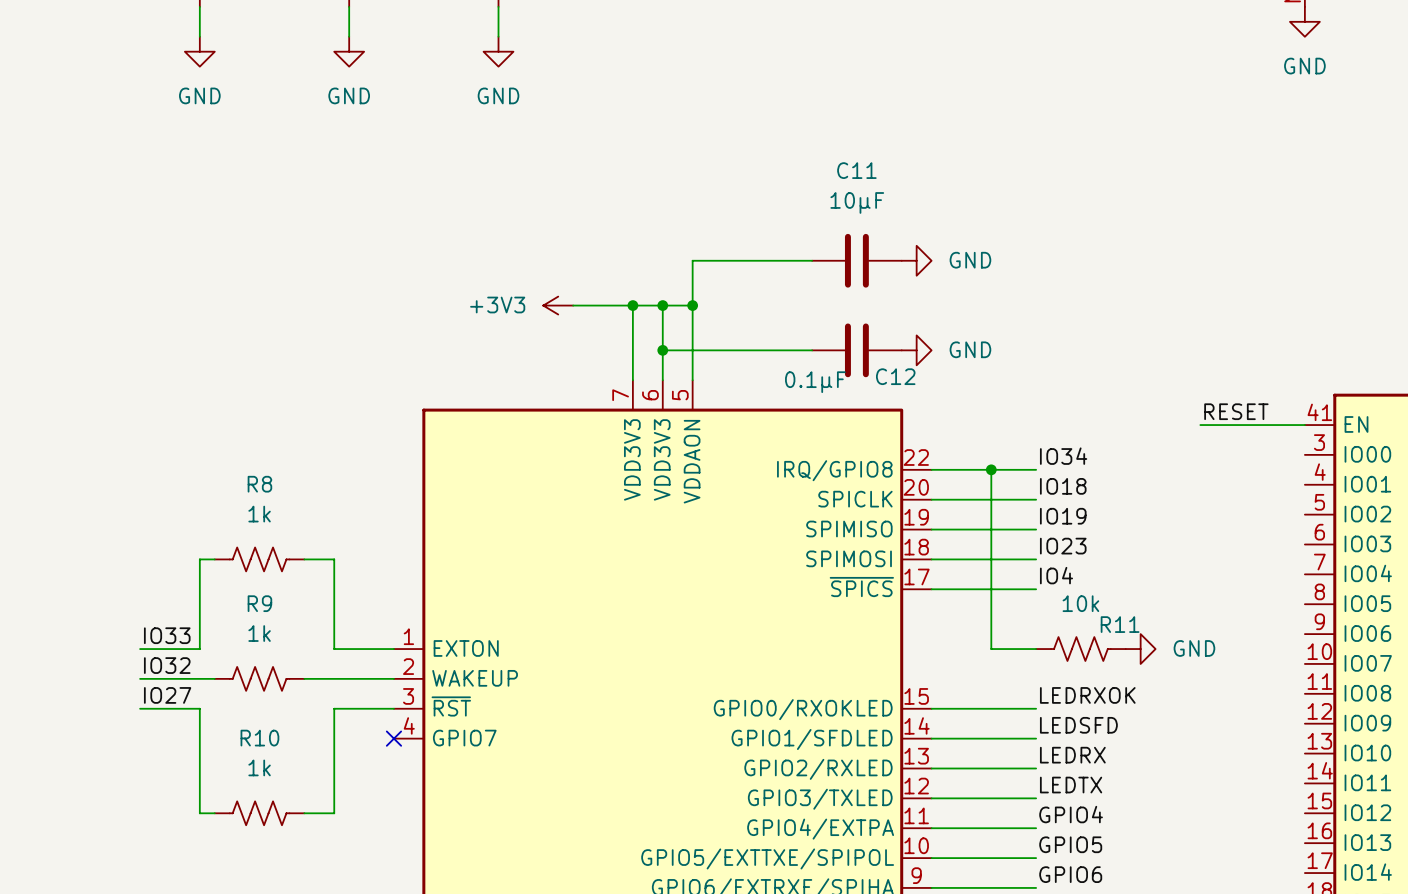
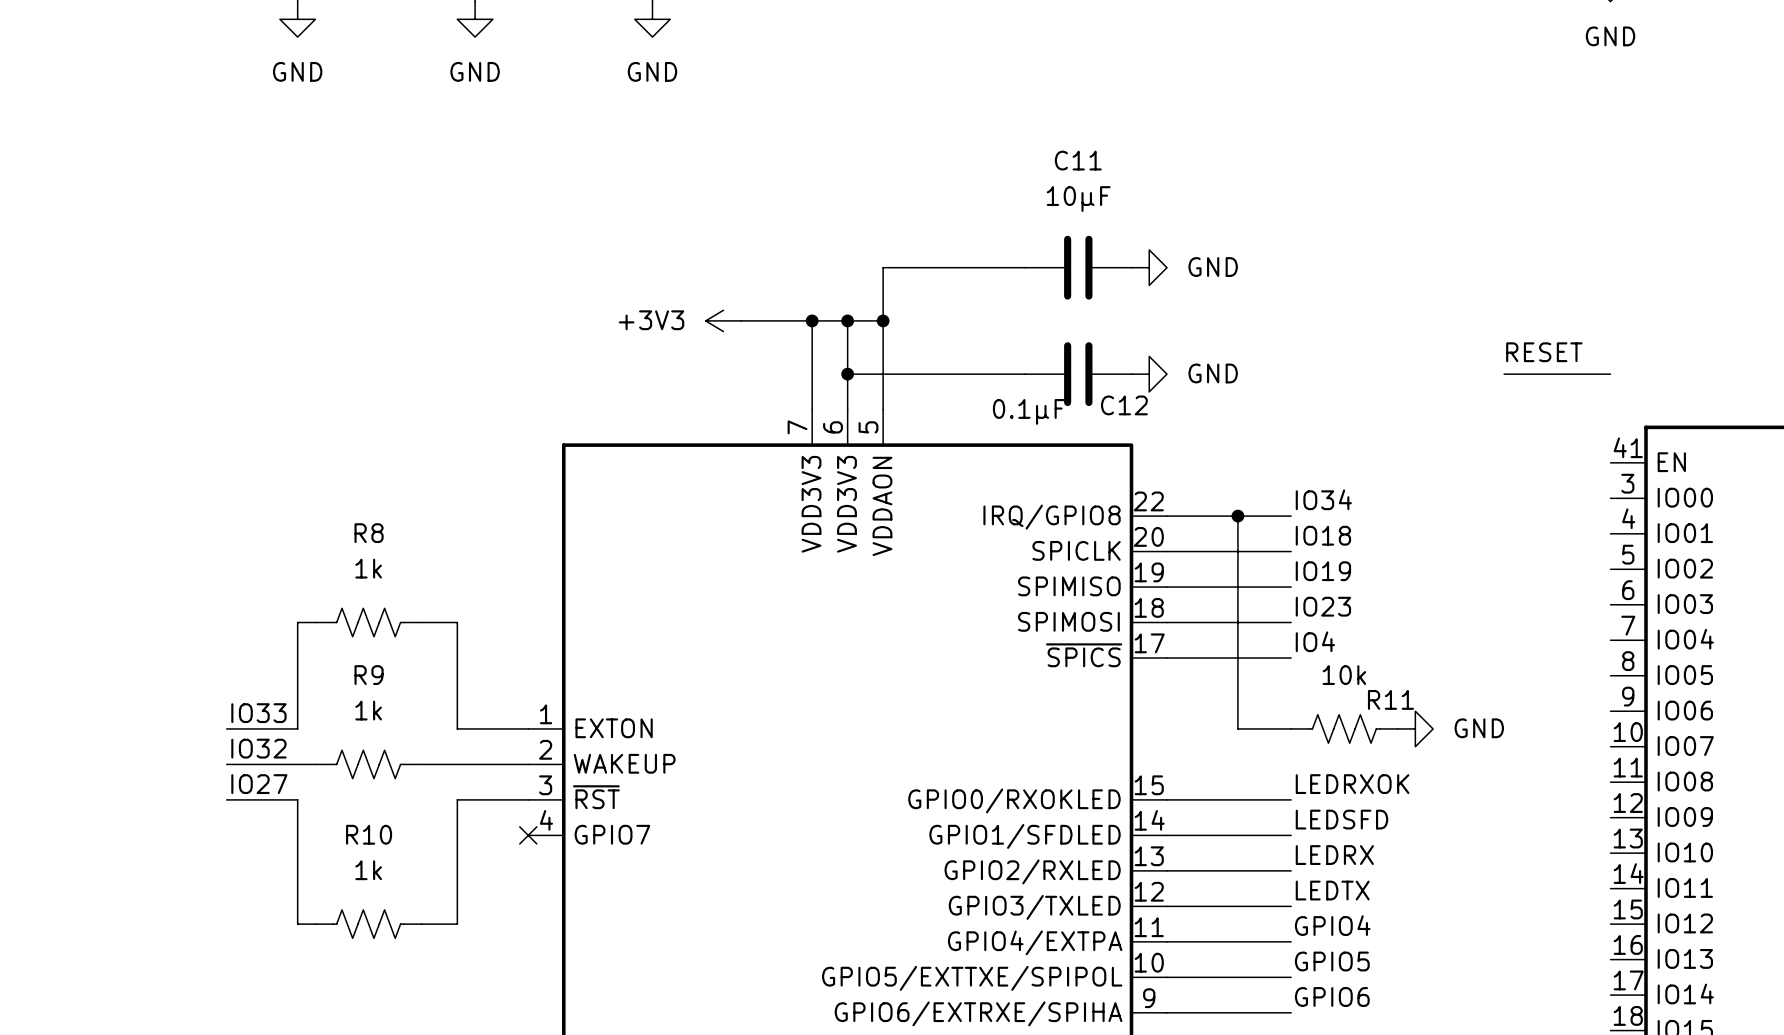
text: none -> RESET (1544, 352)
wire: none -> (1504, 374) (1610, 374)
label: RESET (1236, 411) -> none
wire: (1200, 425) (1304, 425) -> none

